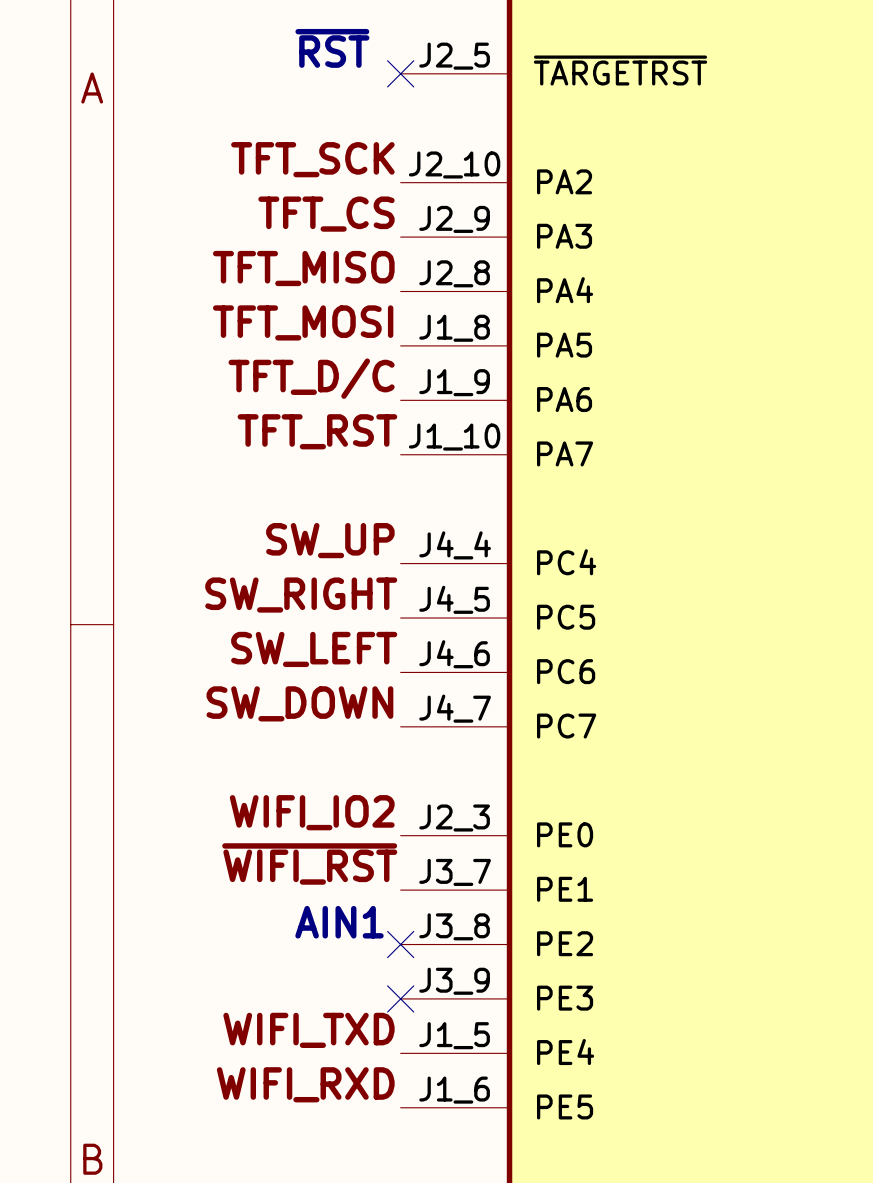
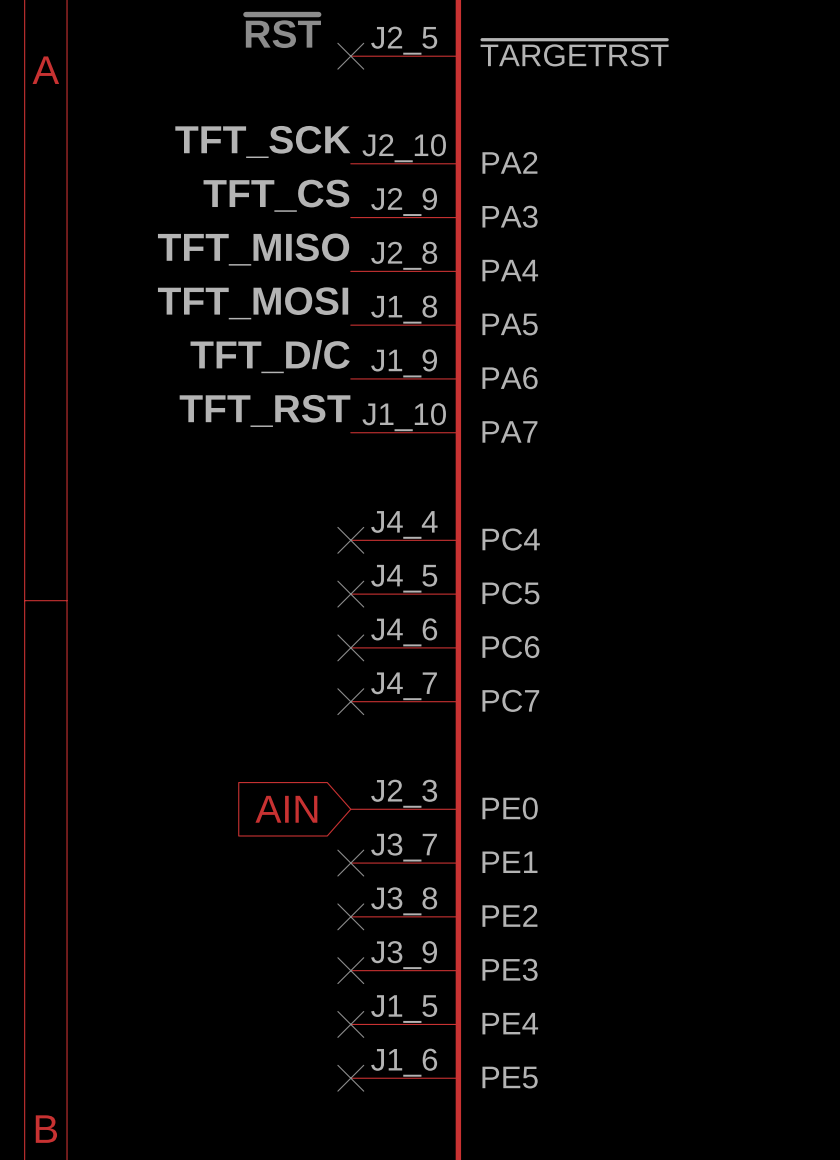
label: SW_UP (330, 540) -> none
no-connect mark: none -> (350, 540)
label: SW_RIGHT (301, 595) -> none
no-connect mark: none -> (350, 594)
label: SW_LEFT (314, 649) -> none
no-connect mark: none -> (350, 647)
label: SW_DOWN (299, 703) -> none
no-connect mark: none -> (350, 701)
label: WIFI_IO2 (312, 812) -> none
global label: none -> AIN (286, 809)
label: ~{WIFI_RST} (309, 863) -> none
no-connect mark: none -> (350, 863)
text: AIN1 (339, 922) -> none
label: WIFI_TXD (309, 1030) -> none
no-connect mark: none -> (350, 1024)
label: WIFI_RXD (305, 1084) -> none
no-connect mark: none -> (350, 1078)

